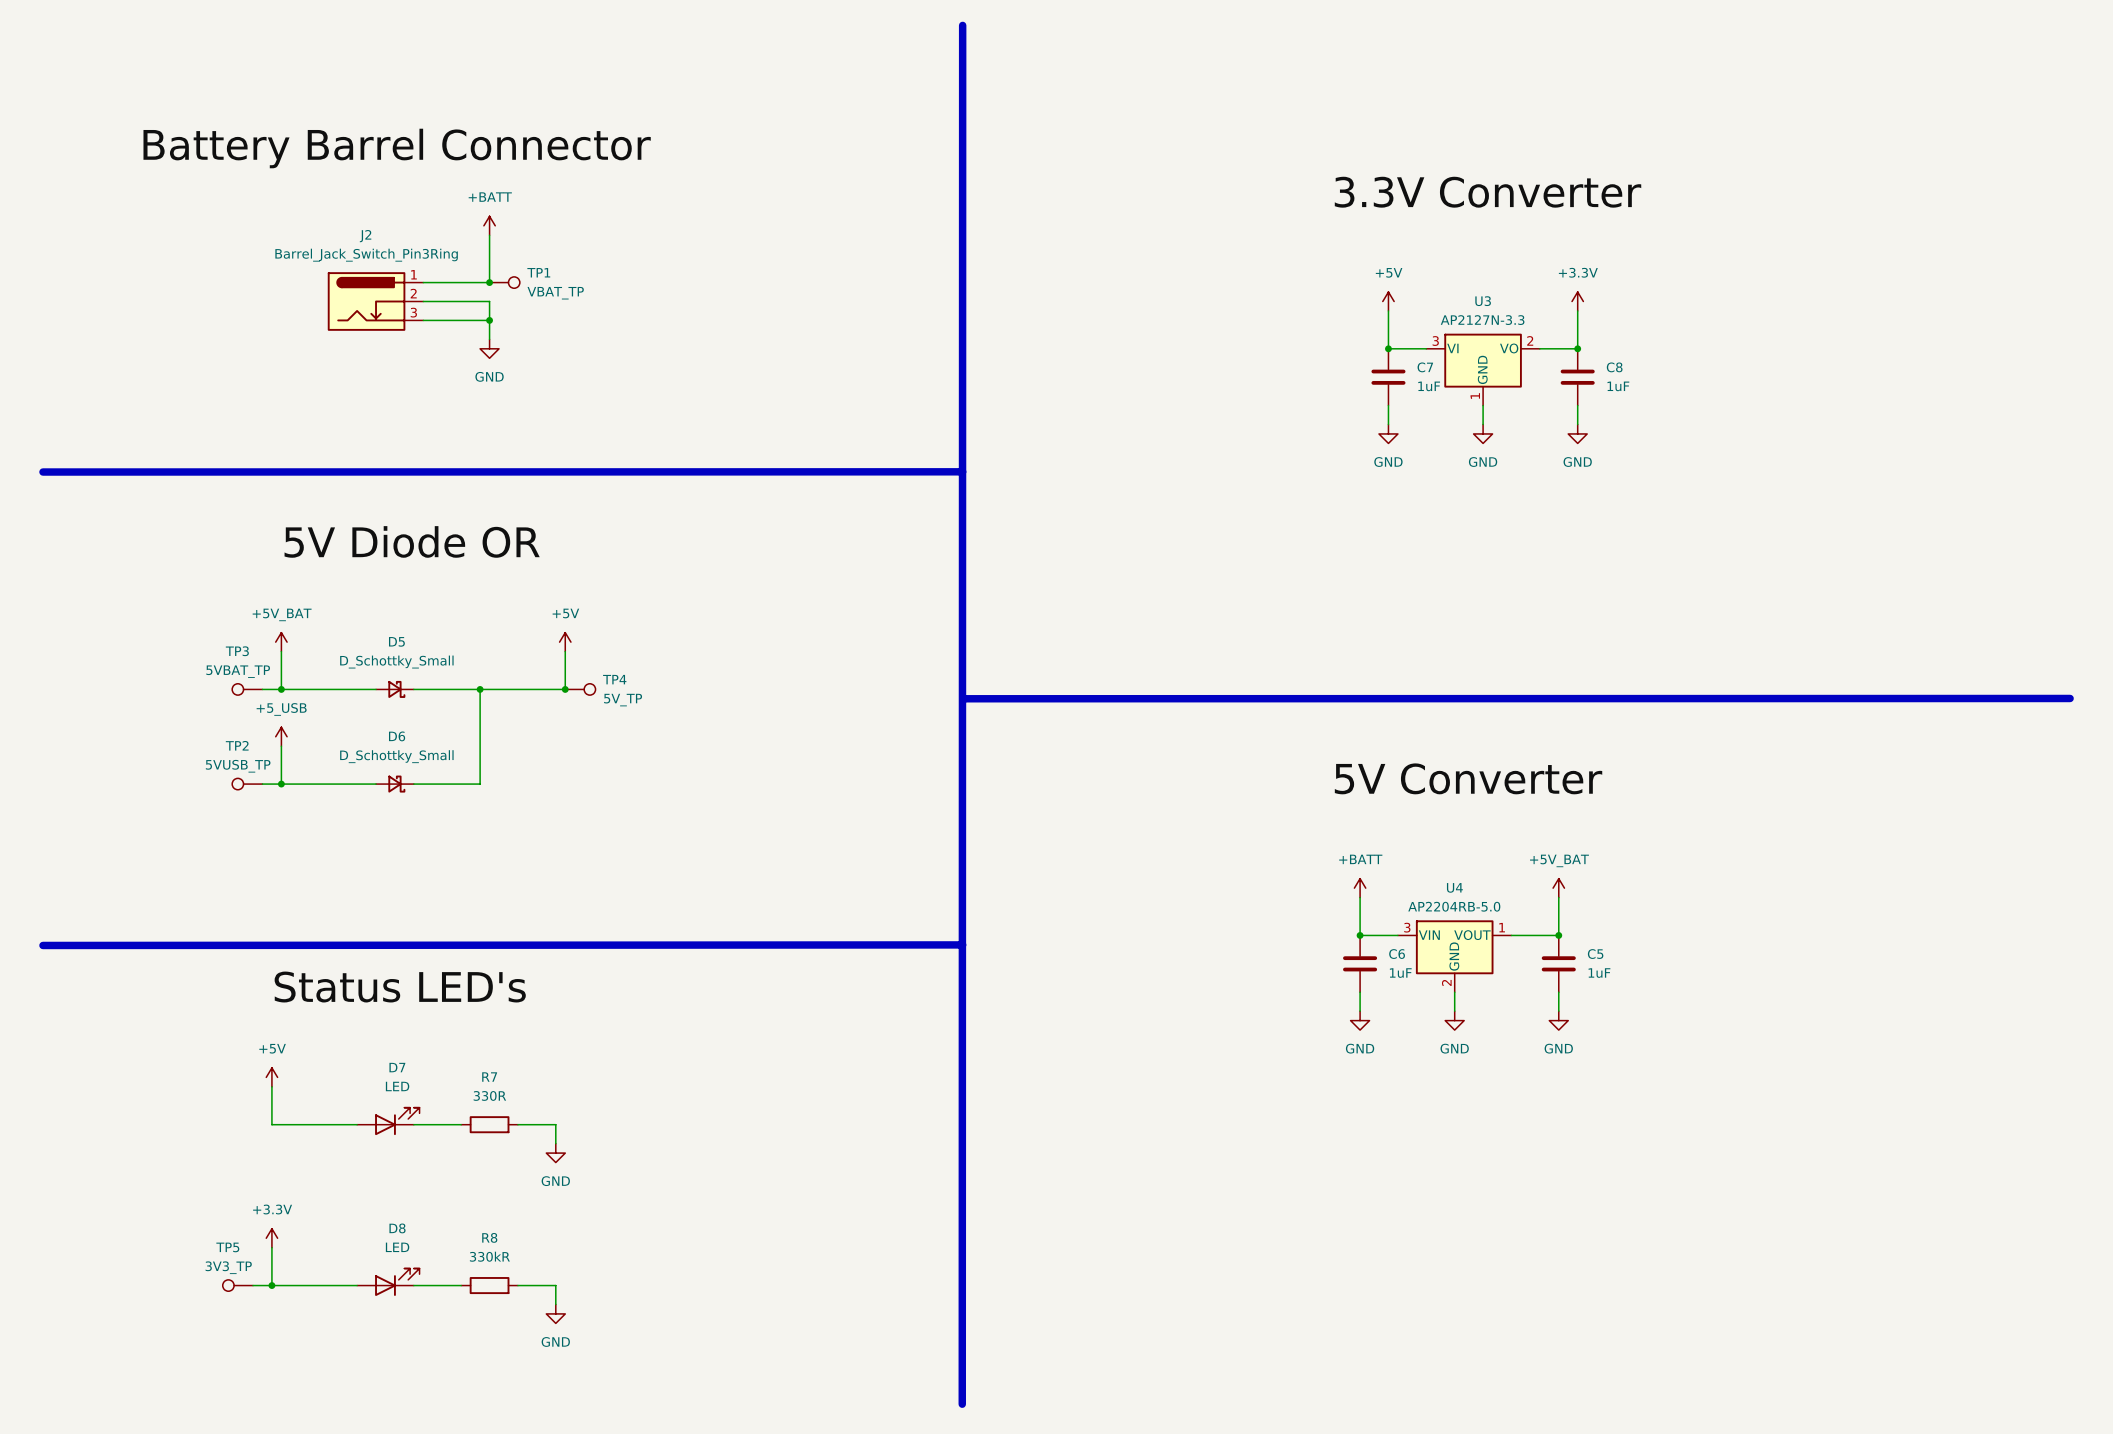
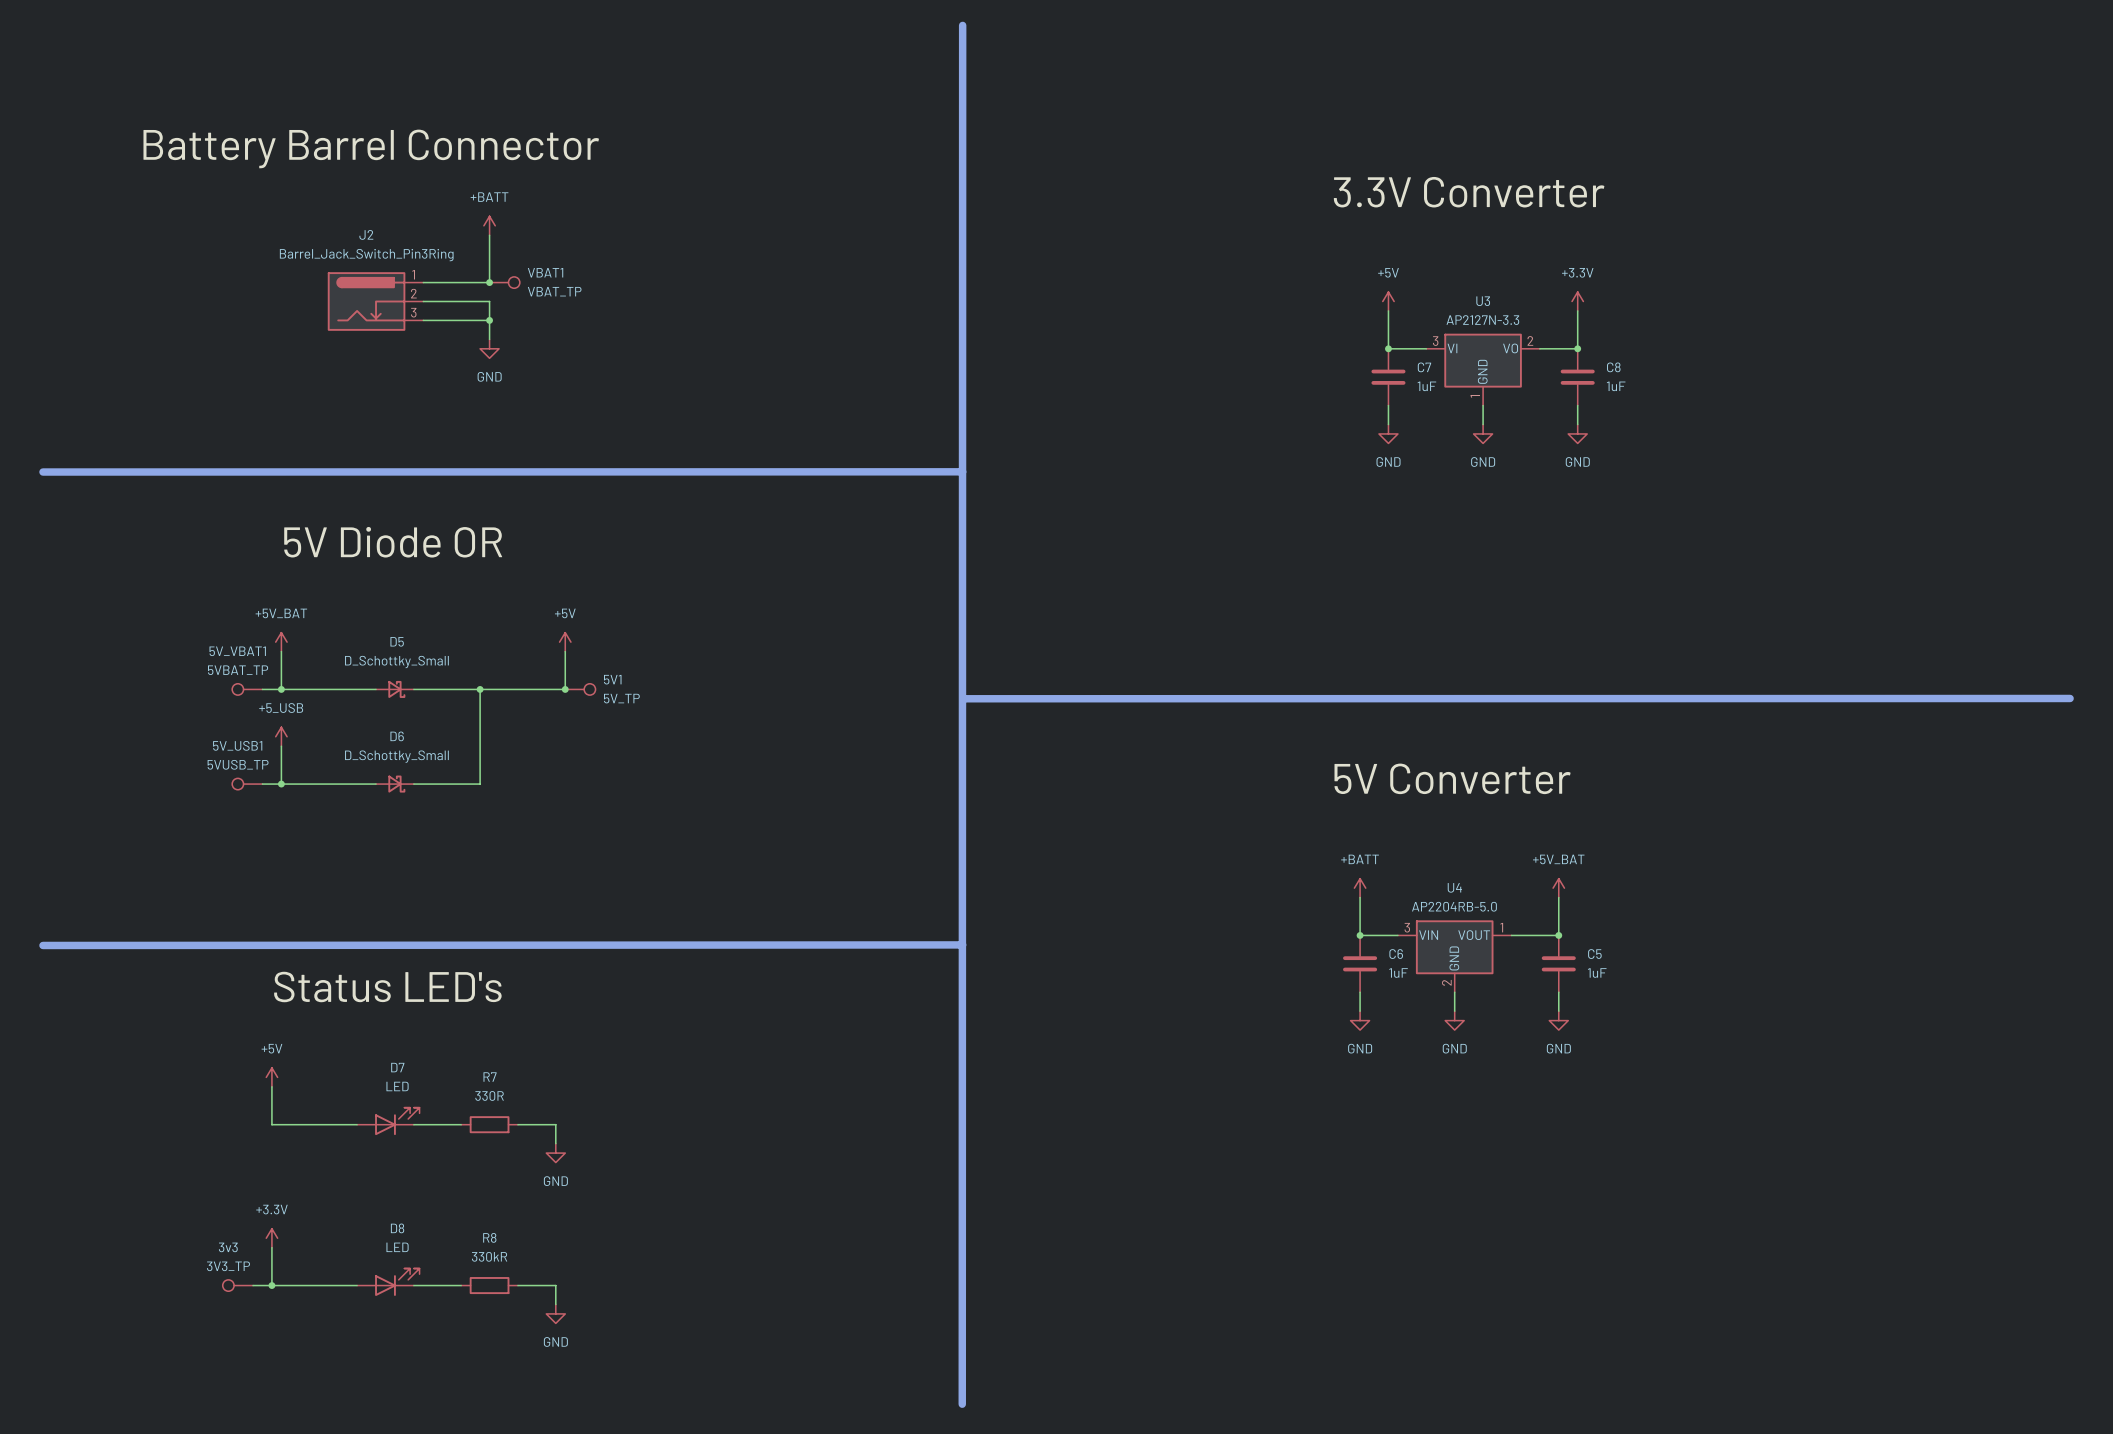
TP1 name: TP1 (538, 272) -> VBAT1 (545, 272)
TP3 name: TP3 (237, 651) -> 5V_VBAT1 (237, 651)
TP4 name: TP4 (614, 679) -> 5V1 (612, 679)
TP2 name: TP2 (237, 745) -> 5V_USB1 (237, 745)
TP5 name: TP5 (227, 1247) -> 3v3 (228, 1247)

